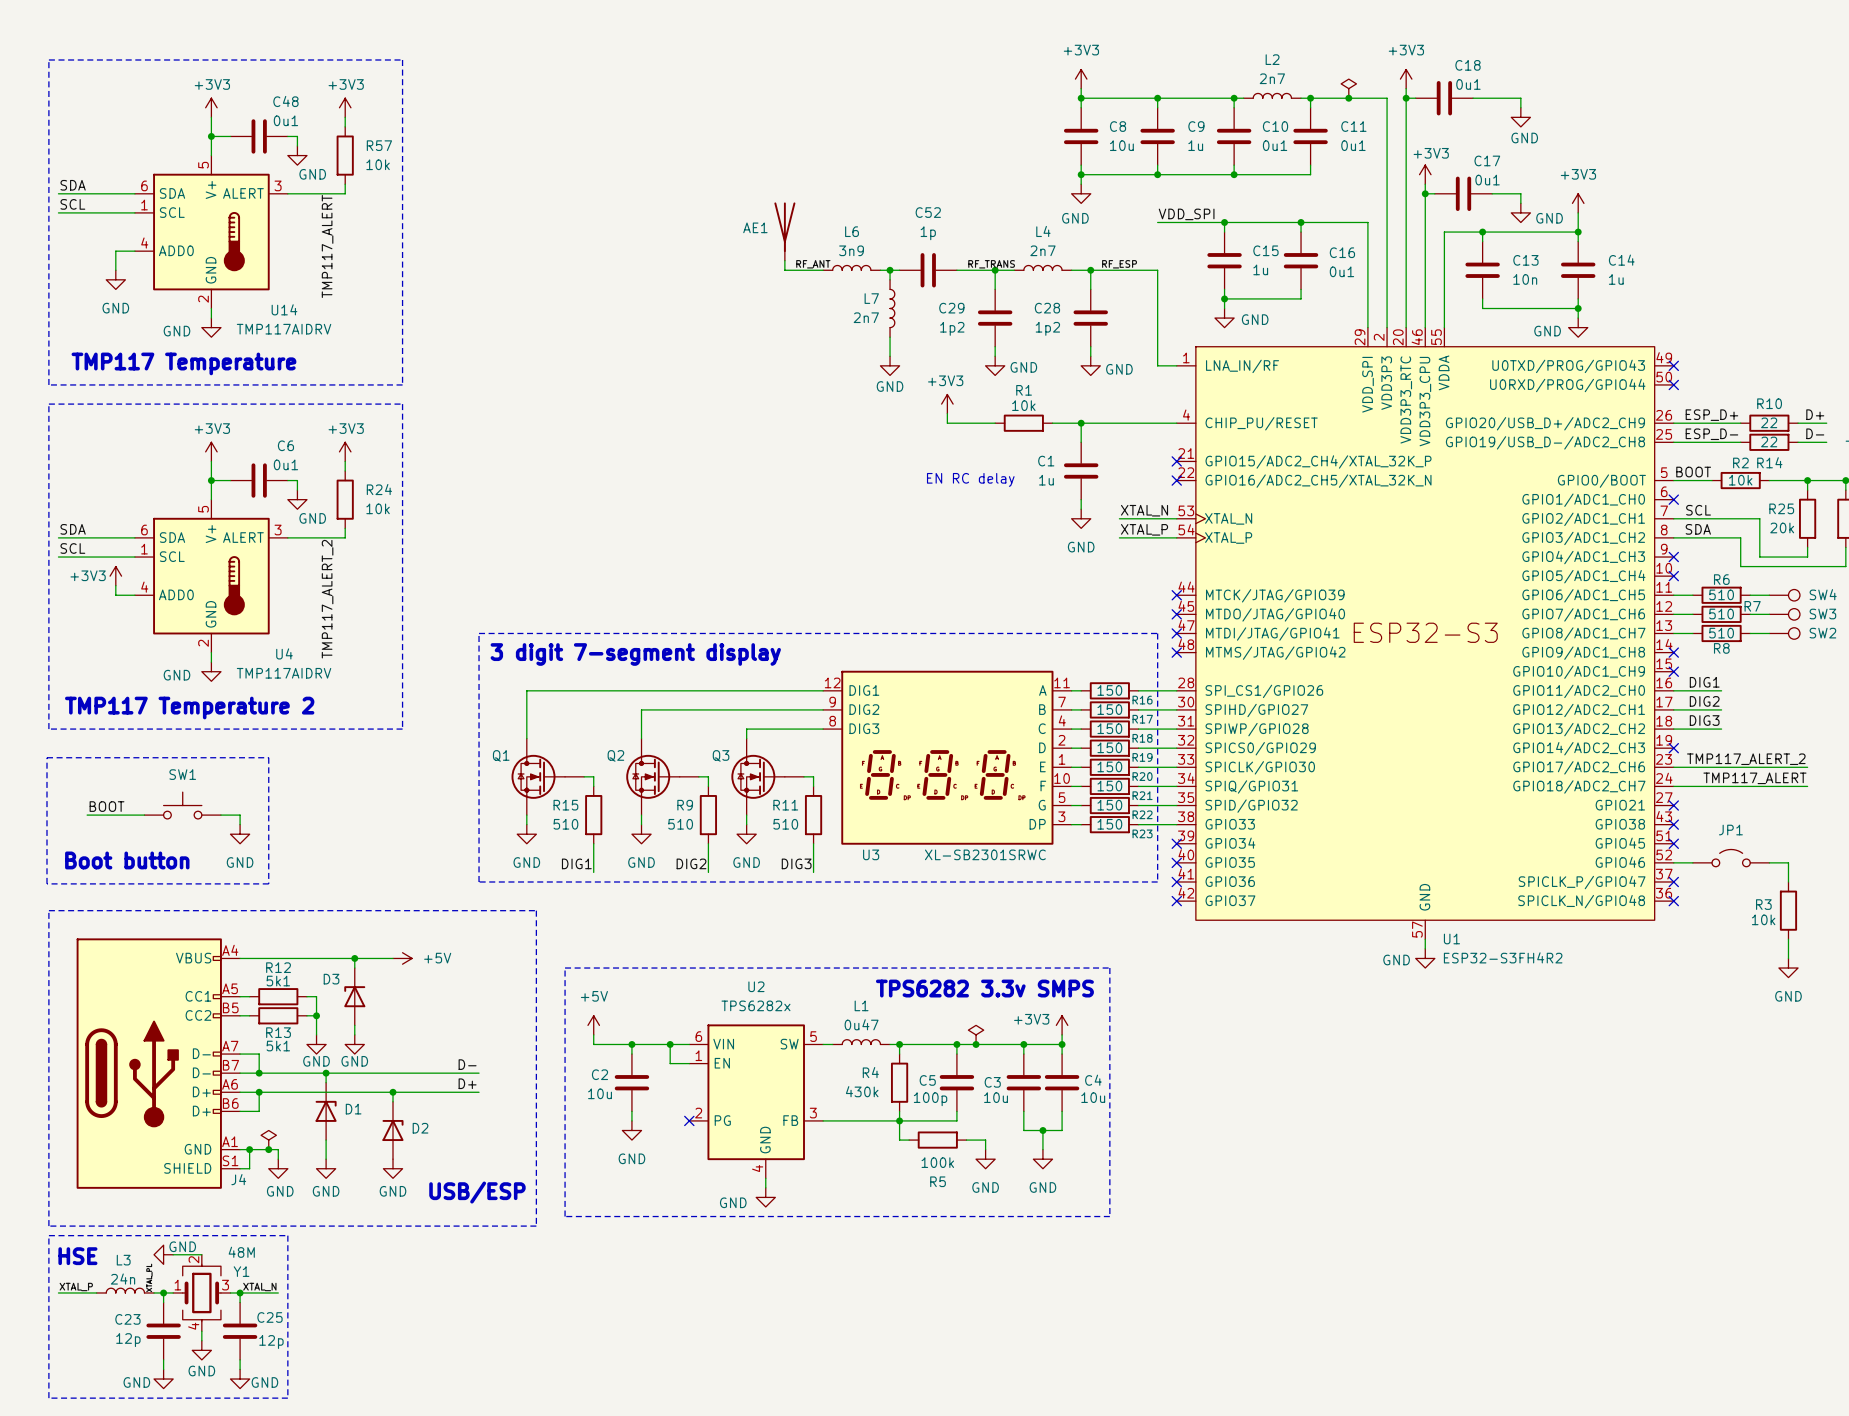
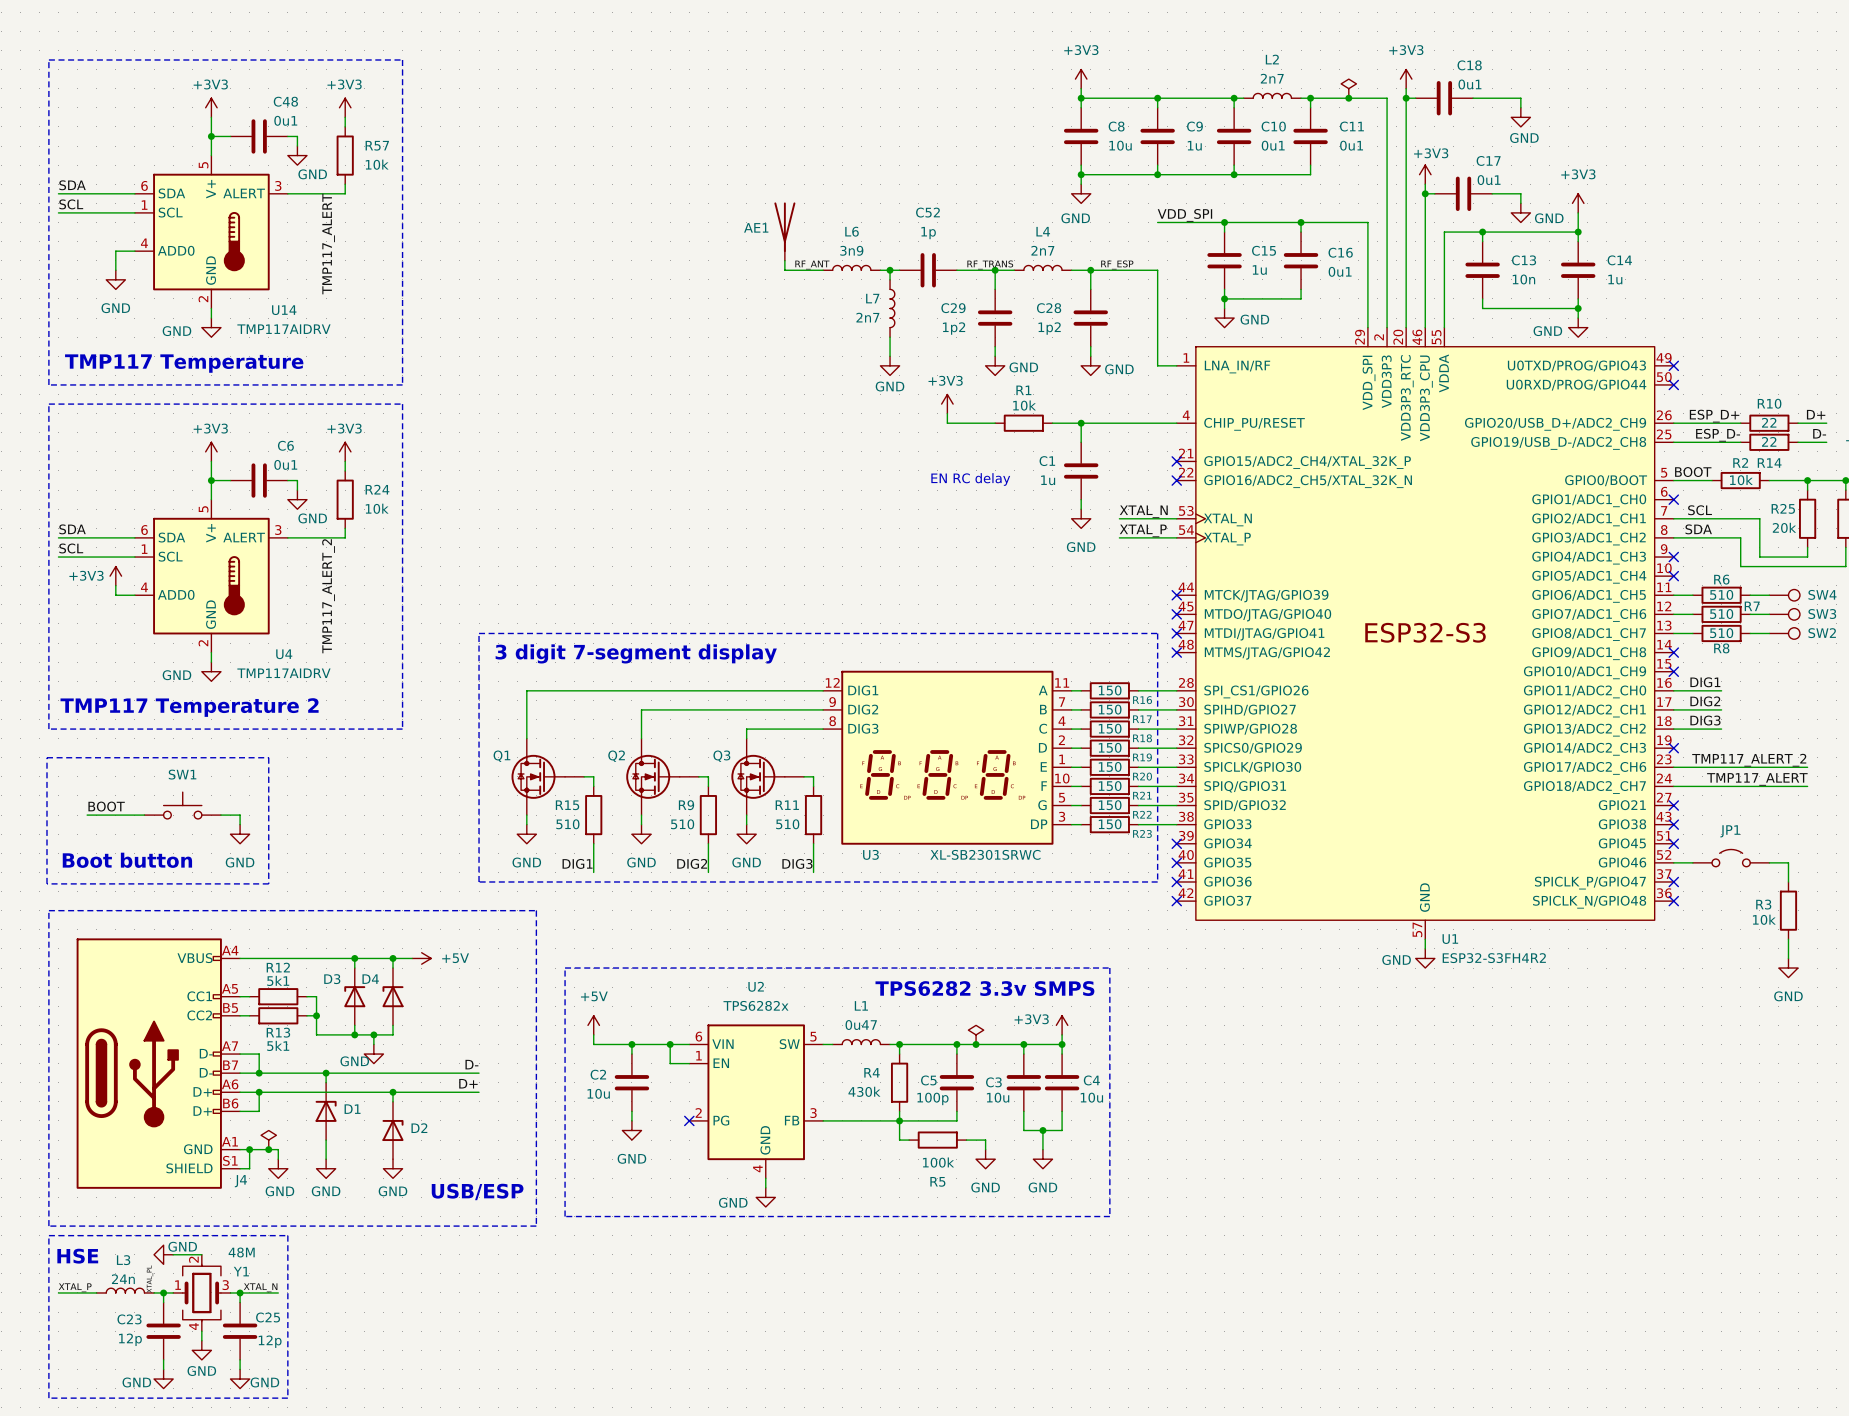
junction: none -> (393, 958)
power symbol position: +5V (402, 958) -> +5V (421, 958)
D4: none -> (393, 996)
wire: none -> (393, 1025) (393, 1034) (316, 1034)
junction: none -> (354, 1034)
wire: none -> (373, 1034) (373, 1044)
junction: none -> (373, 1034)
power symbol: GND (316, 1044) -> none
power symbol position: GND (354, 1044) -> GND (373, 1054)

